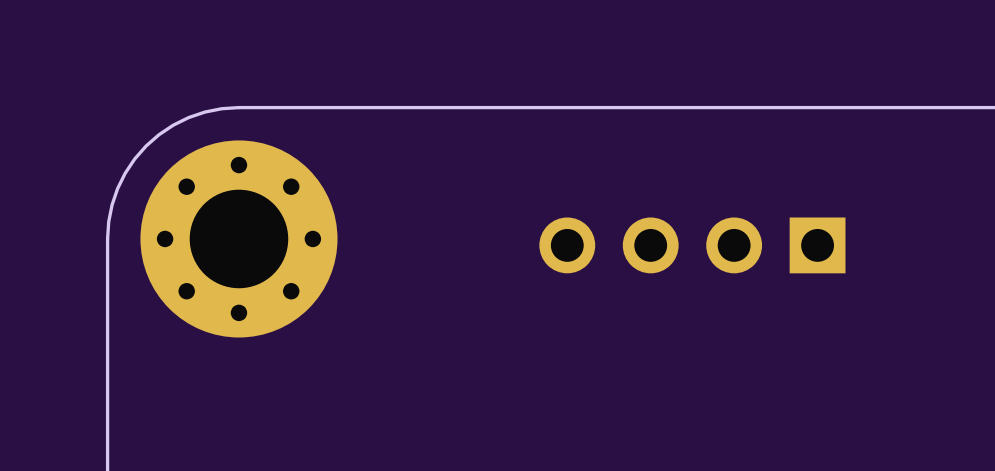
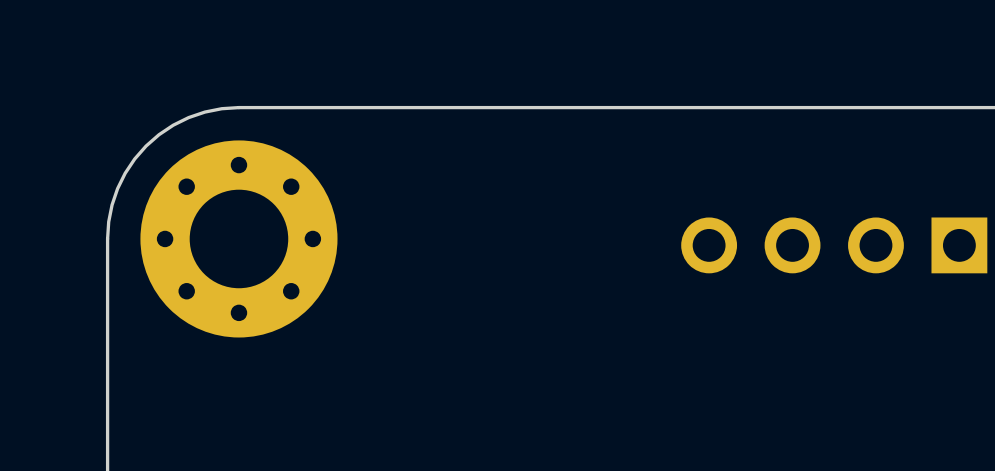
part position: (692, 245) -> (834, 245)

